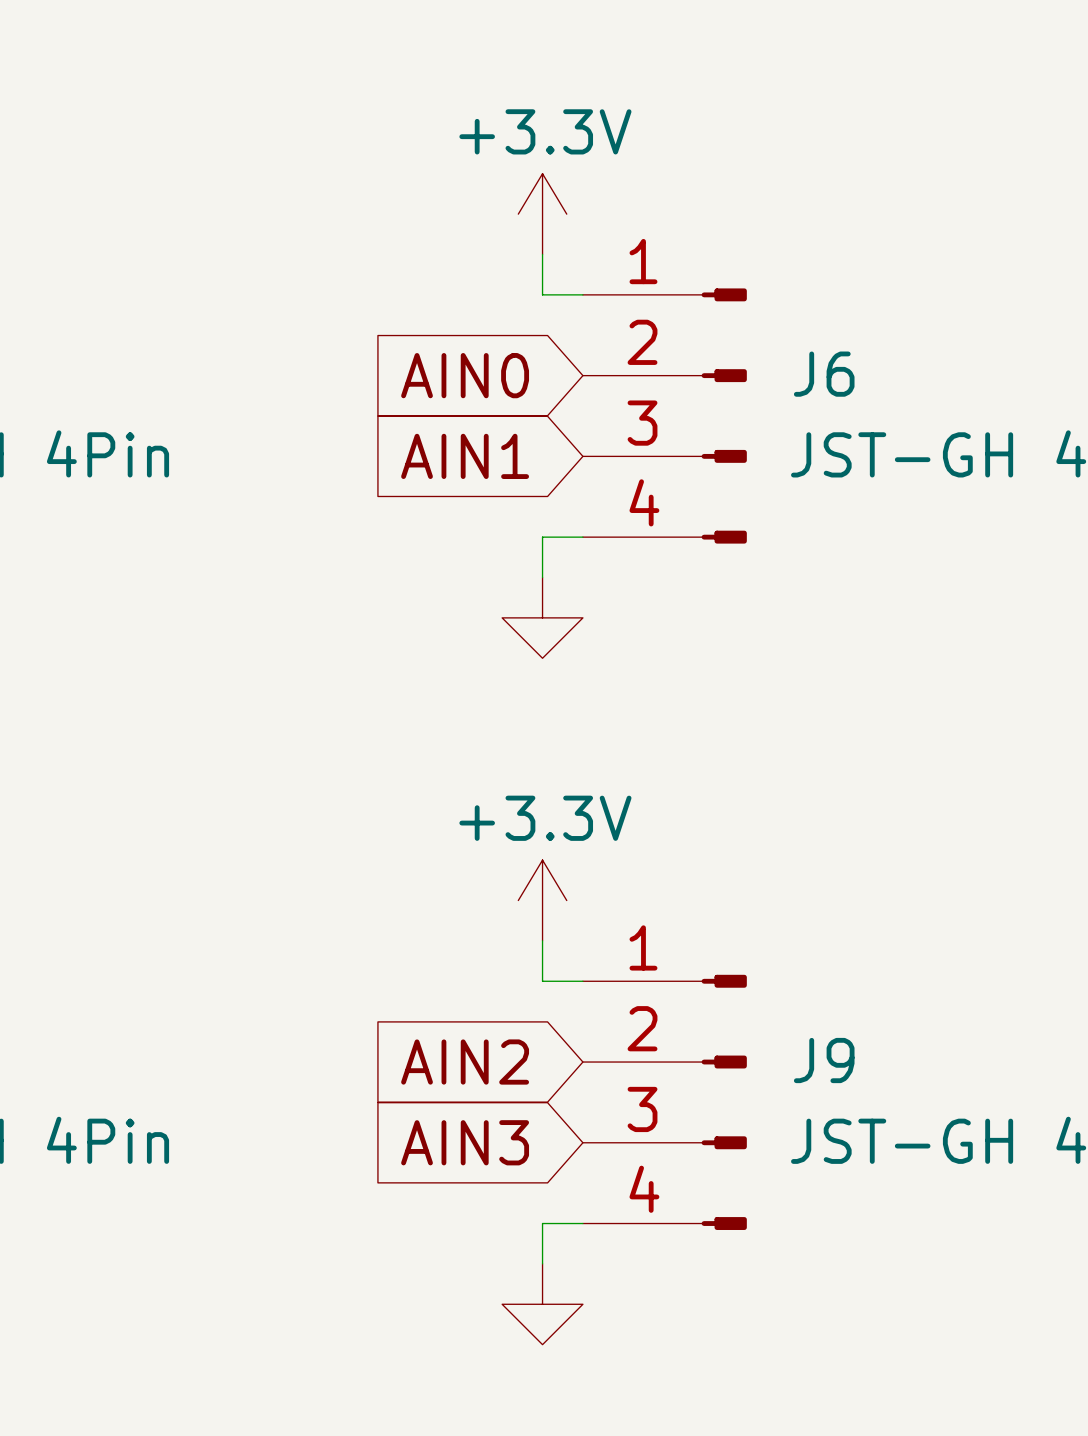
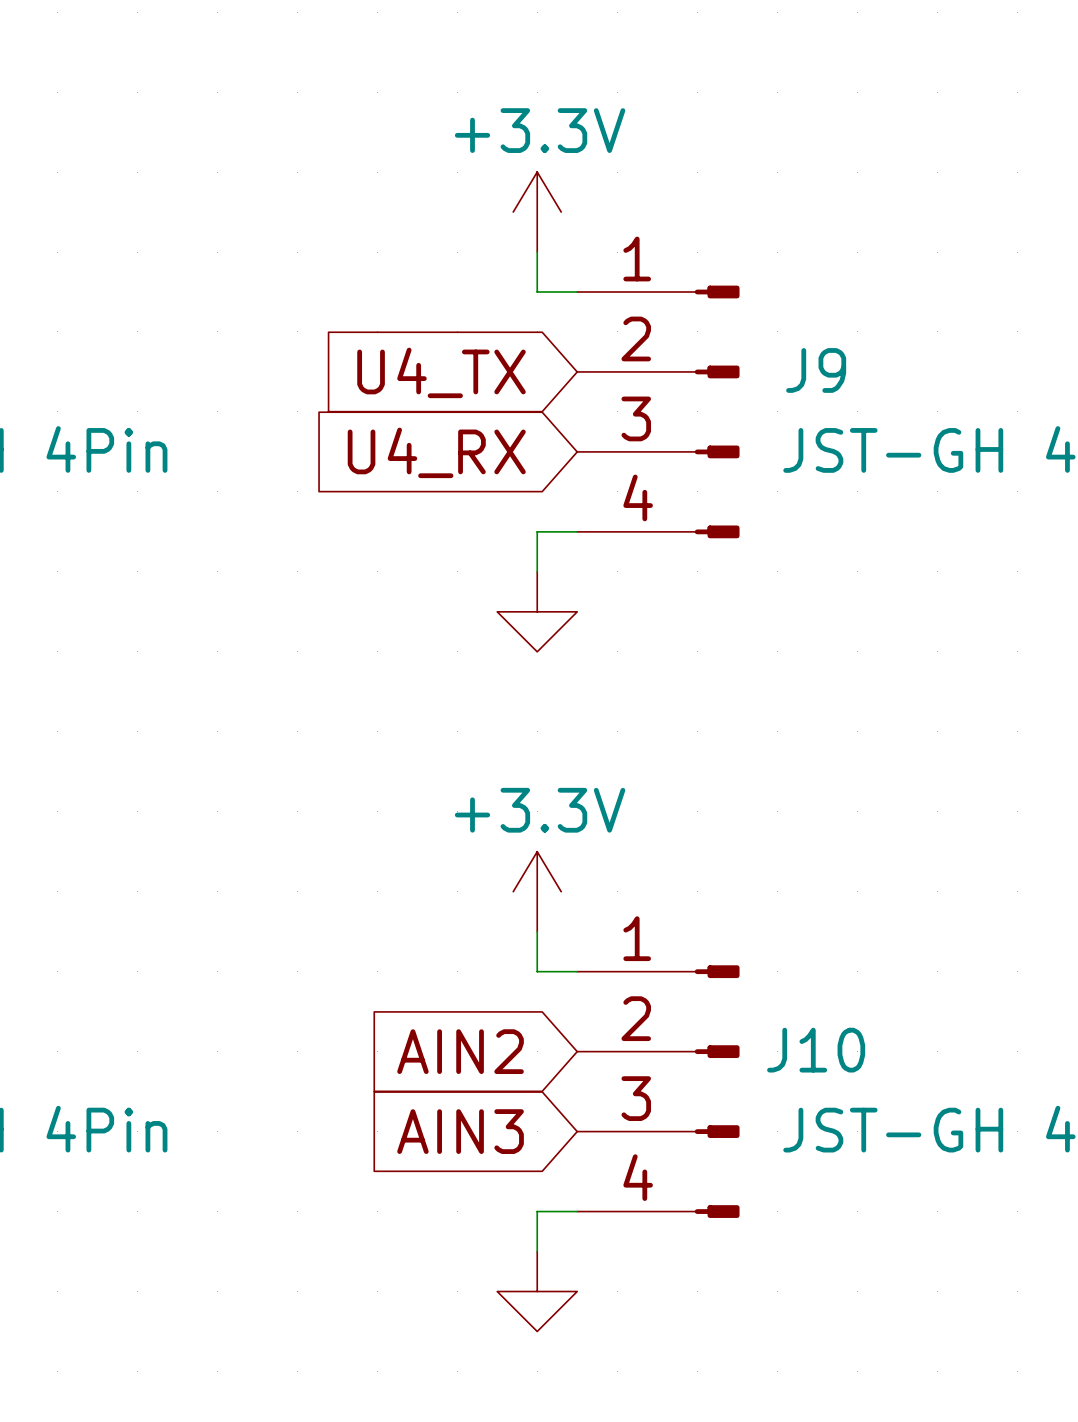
J6 name: J6 (824, 374) -> J9 (816, 370)
global label: AIN0 (465, 375) -> U4_TX (441, 372)
global label: AIN1 (465, 456) -> U4_RX (436, 452)
J9 name: J9 (824, 1060) -> J10 (816, 1050)

